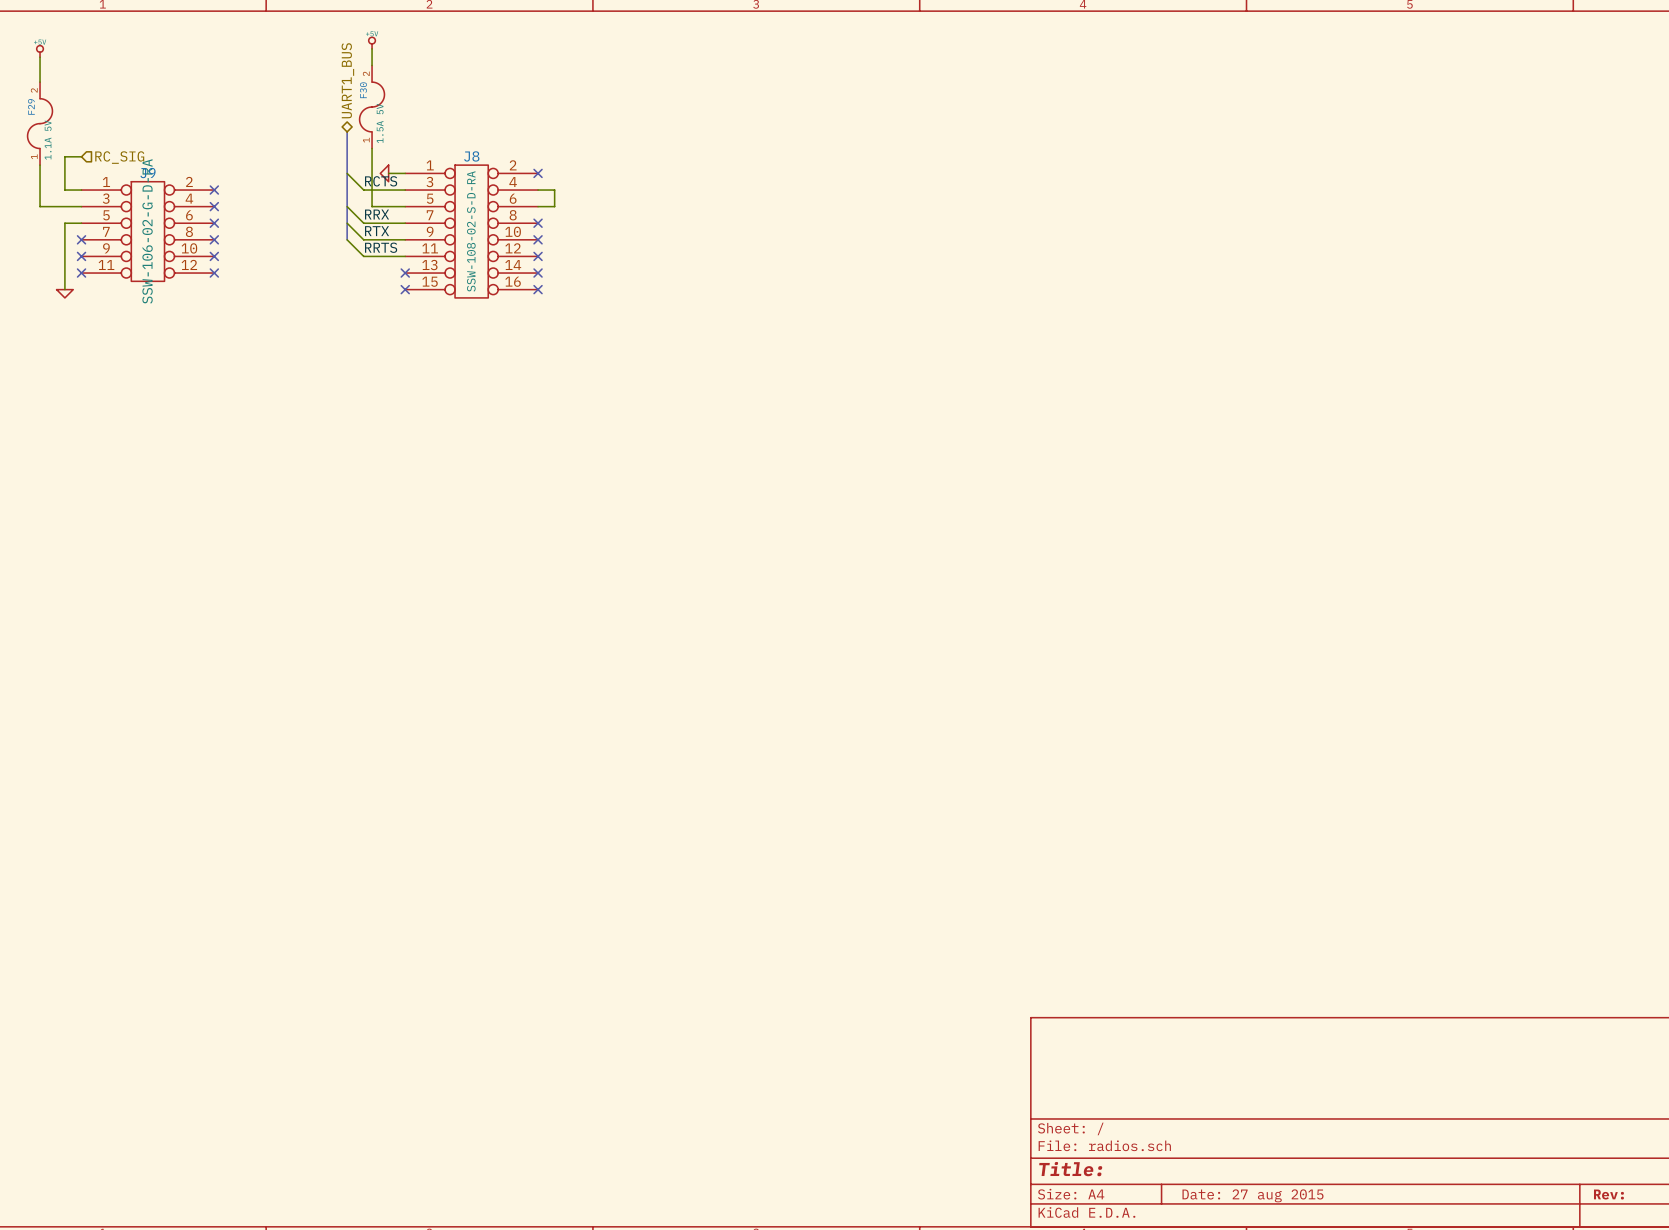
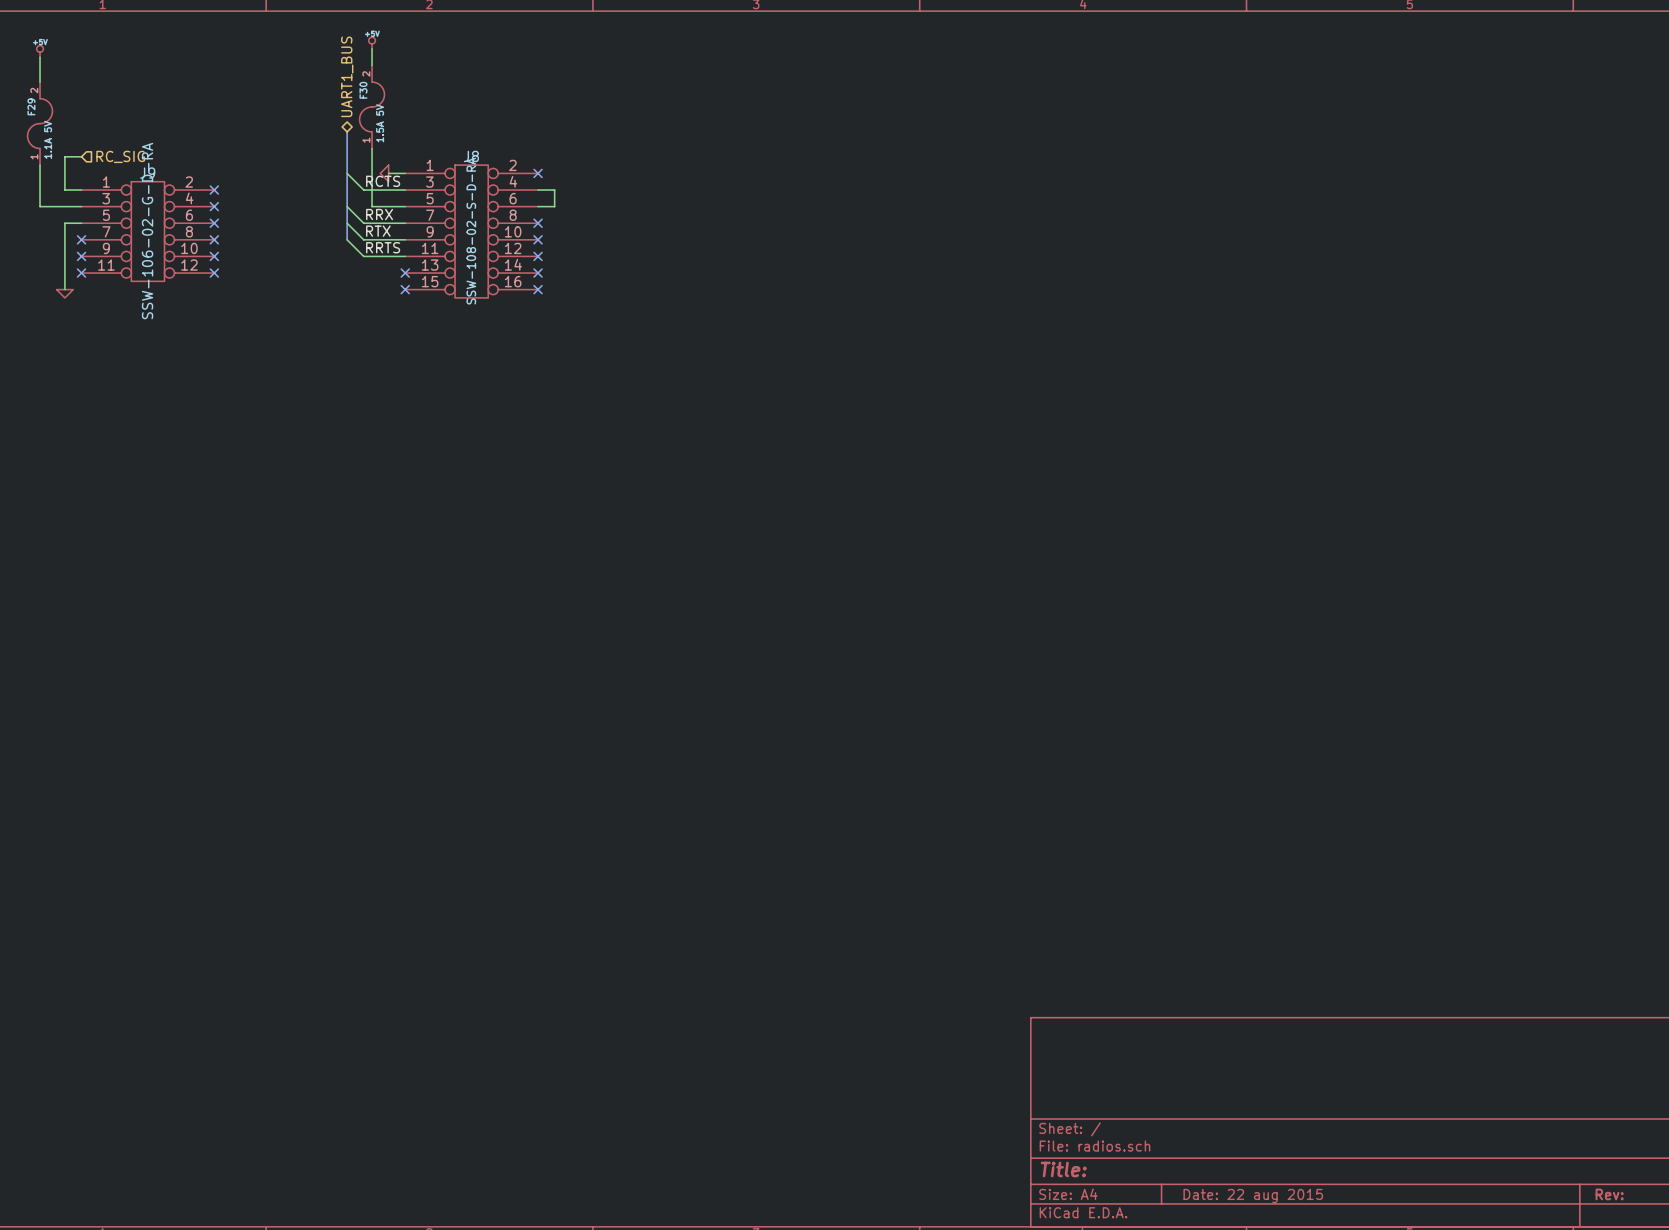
title block: Date: 27 aug 2015 (1252, 1195) -> Date: 22 aug 2015 (1253, 1196)

